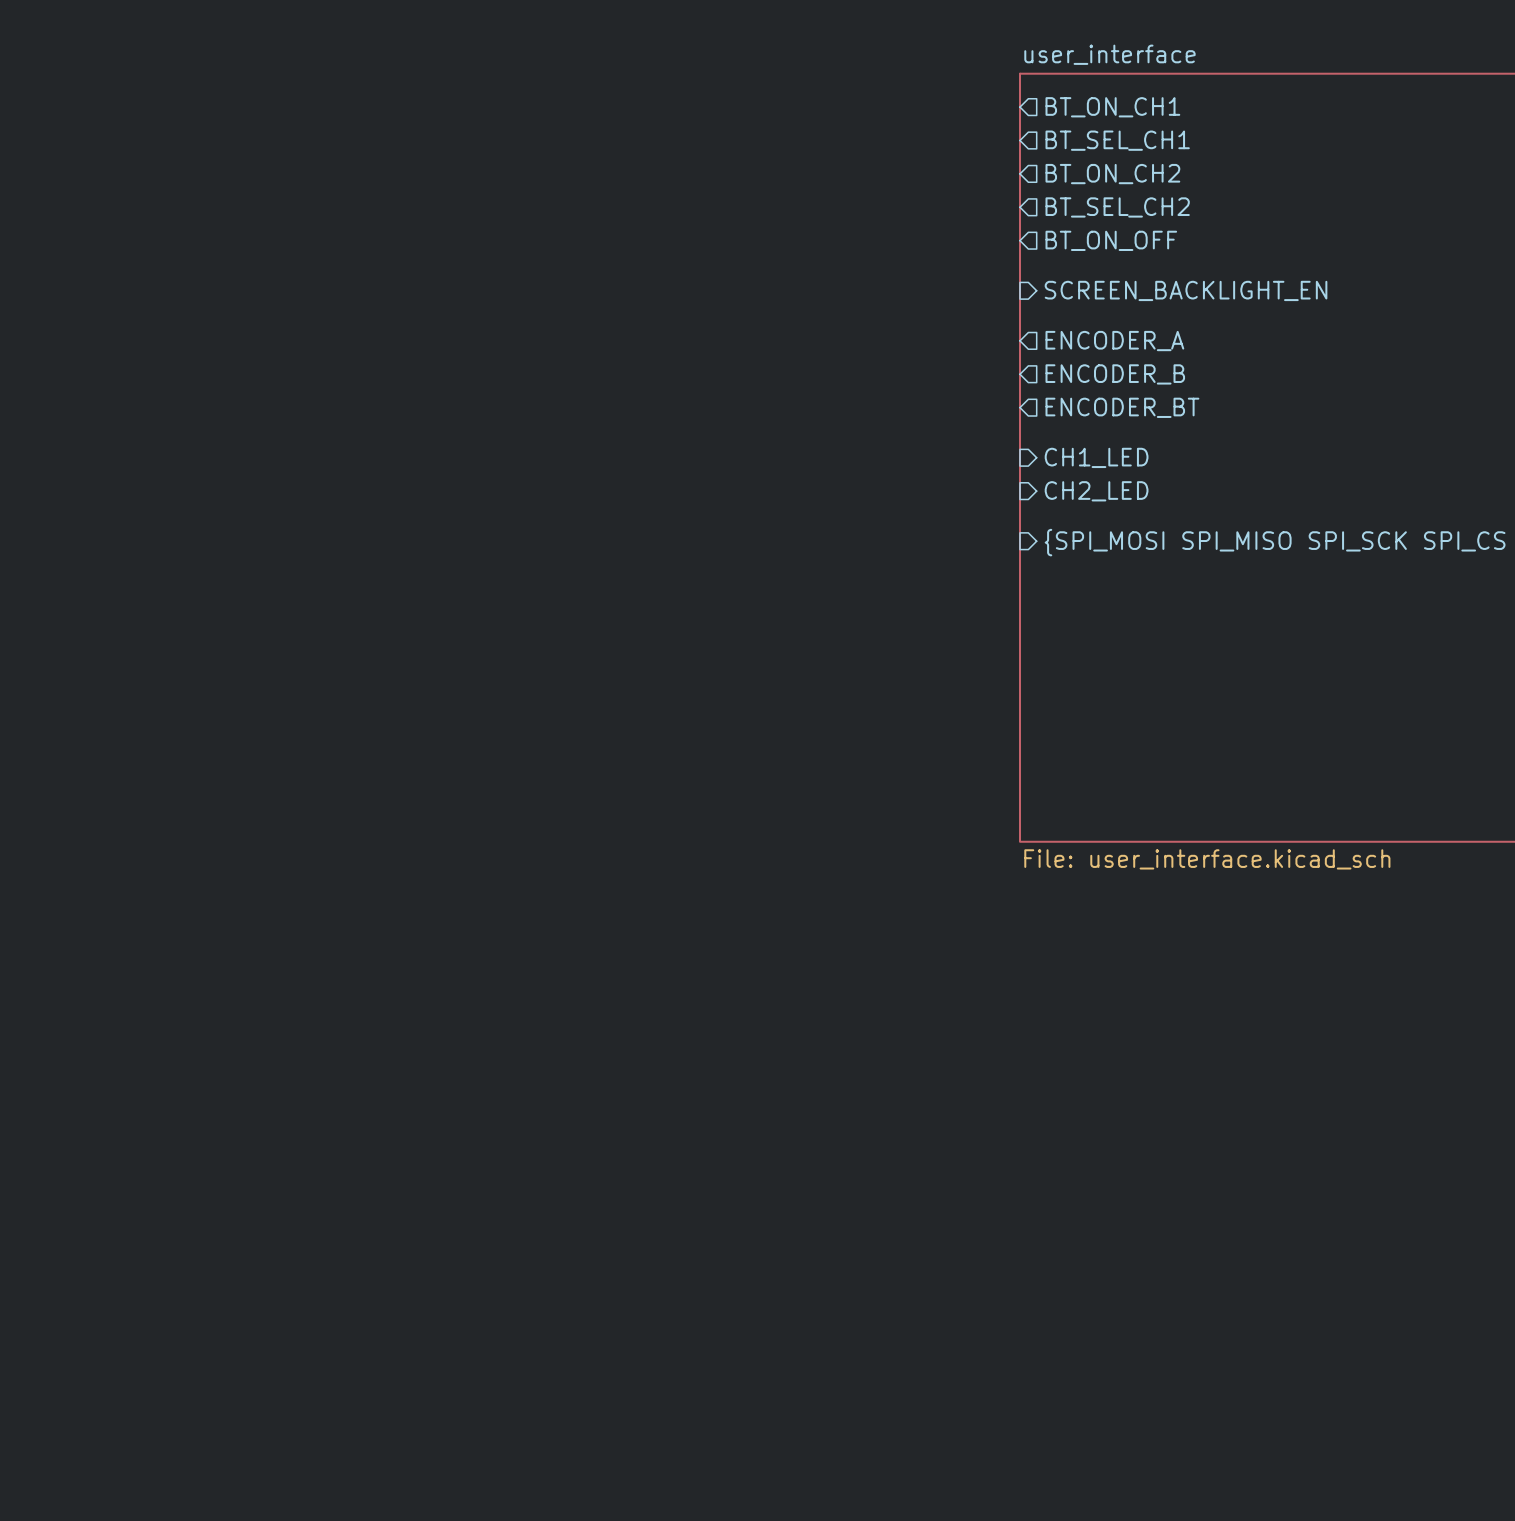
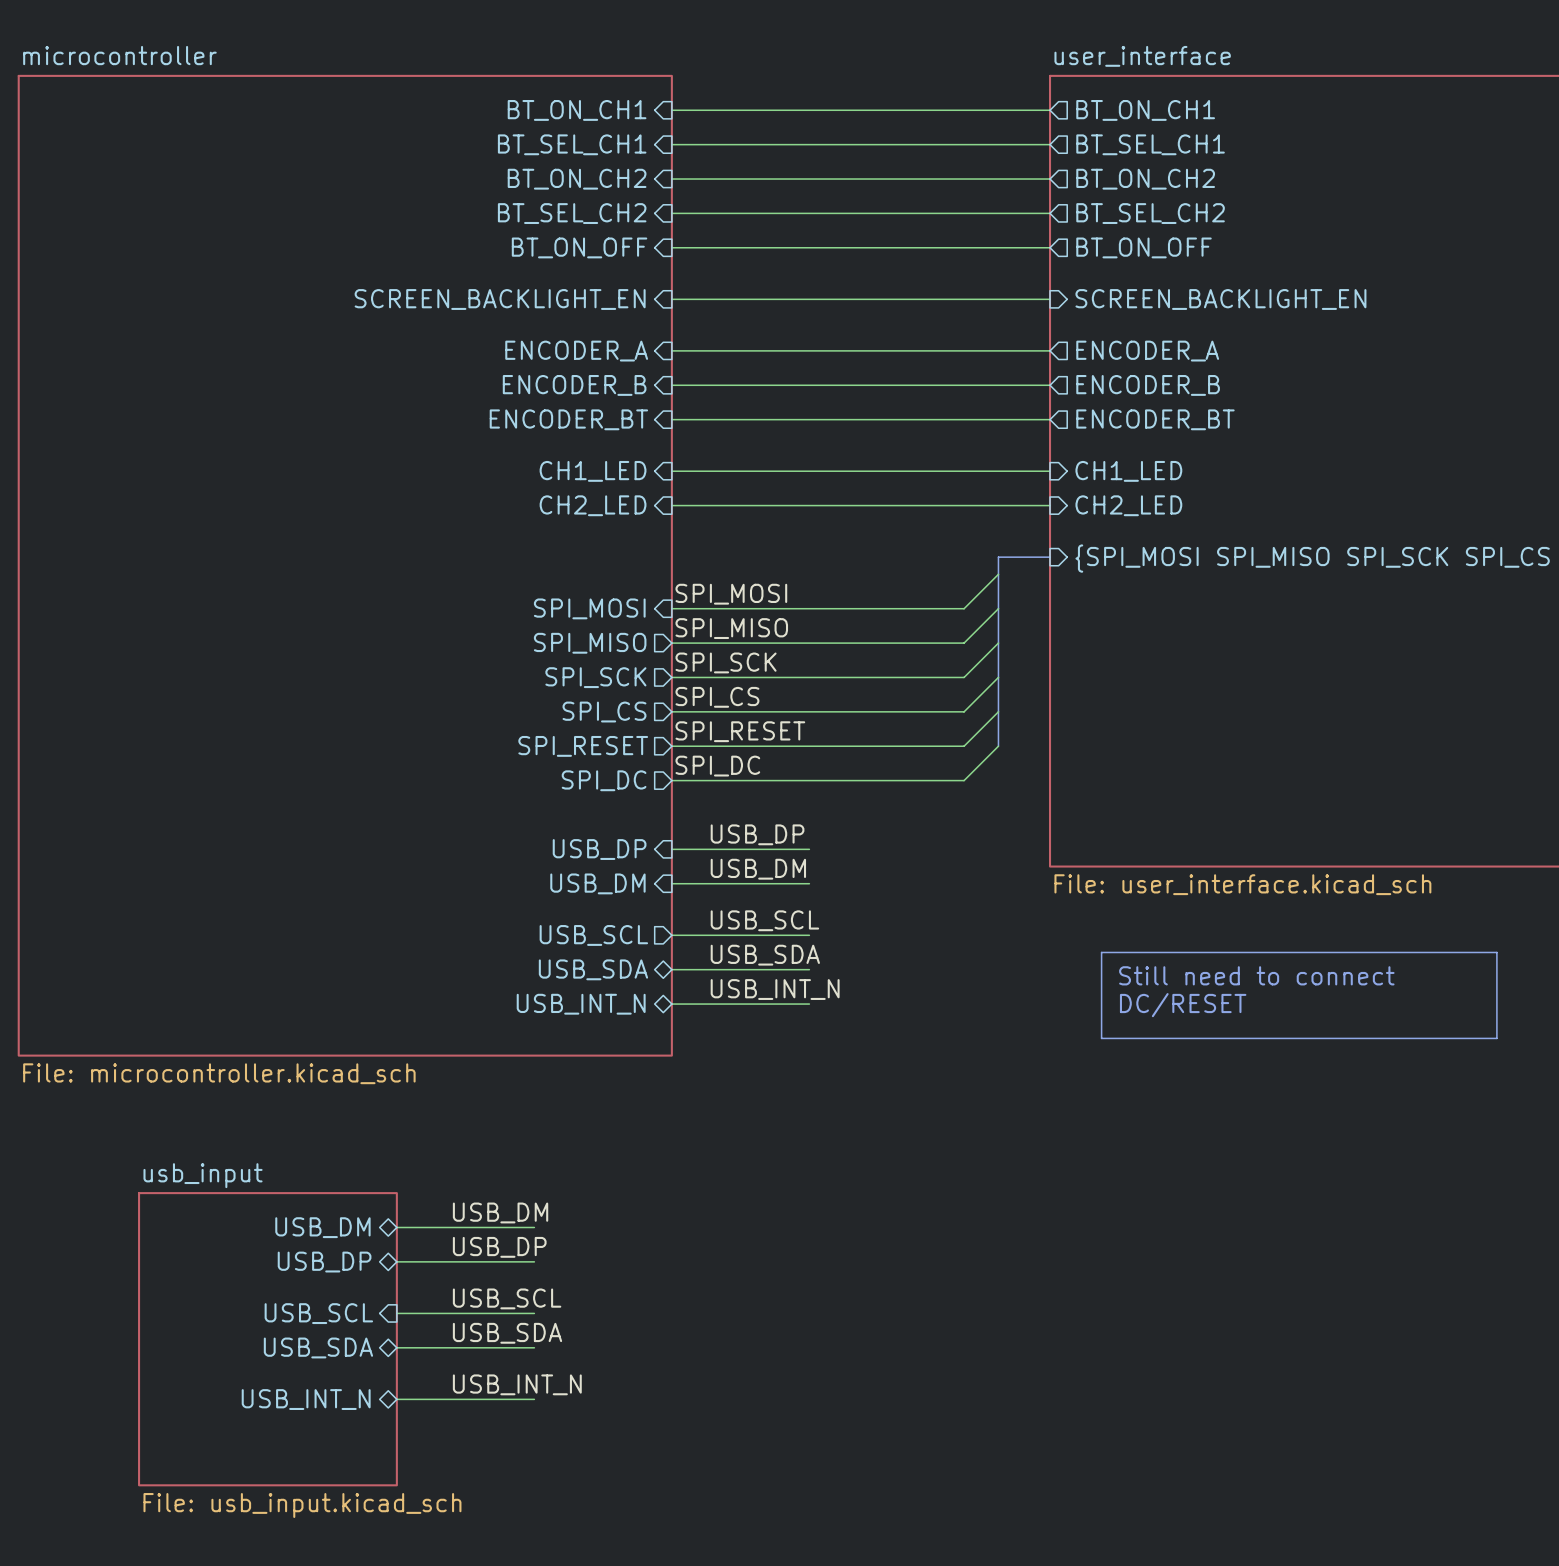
sheet pin: none -> BT_ON_CH1 (577, 110)
wire: none -> (671, 110) (1050, 110)
sheet pin: none -> BT_SEL_CH1 (572, 144)
wire: none -> (671, 144) (1050, 144)
wire: none -> (671, 179) (1050, 179)
sheet pin: none -> BT_ON_CH2 (577, 179)
sheet pin: none -> BT_SEL_CH2 (572, 213)
wire: none -> (671, 213) (1050, 213)
sheet pin: none -> BT_ON_OFF (579, 247)
wire: none -> (671, 247) (1050, 247)
sheet pin: none -> SCREEN_BACKLIGHT_EN (500, 299)
wire: none -> (671, 299) (1050, 299)
wire: none -> (671, 350) (1050, 350)
sheet pin: none -> ENCODER_A (576, 351)
sheet pin: none -> ENCODER_B (574, 385)
wire: none -> (671, 385) (1050, 385)
sheet pin: none -> ENCODER_BT (568, 419)
wire: none -> (671, 419) (1050, 419)
sheet pin: none -> CH1_LED (593, 471)
wire: none -> (671, 471) (1050, 471)
sheet pin: none -> CH2_LED (593, 505)
wire: none -> (671, 505) (1050, 505)
bus: none -> (1050, 557) (998, 557) (998, 746)
sheet microcontroller: none -> File: microcontroller.kicad_sch (345, 565)
wire: none -> (998, 574) (964, 608) (671, 608)
label: none -> SPI_MOSI (731, 594)
sheet pin: none -> SPI_MOSI (589, 608)
wire: none -> (998, 608) (964, 643) (671, 643)
label: none -> SPI_MISO (731, 628)
sheet pin: none -> SPI_MISO (590, 643)
wire: none -> (998, 643) (964, 677) (671, 677)
label: none -> SPI_SCK (726, 662)
sheet pin: none -> SPI_SCK (595, 677)
wire: none -> (998, 677) (964, 711) (671, 711)
label: none -> SPI_CS (717, 697)
sheet pin: none -> SPI_CS (604, 712)
wire: none -> (998, 711) (964, 746) (671, 746)
label: none -> SPI_RESET (740, 731)
wire: none -> (998, 746) (964, 780) (671, 780)
sheet pin: none -> SPI_RESET (583, 746)
label: none -> SPI_DC (717, 766)
sheet pin: none -> SPI_DC (604, 780)
label: none -> USB_DP (757, 834)
sheet pin: none -> USB_DP (599, 849)
wire: none -> (671, 849) (809, 849)
label: none -> USB_DM (758, 869)
sheet pin: none -> USB_DM (597, 883)
wire: none -> (671, 883) (809, 883)
label: none -> USB_SCL (764, 920)
sheet pin: none -> USB_SCL (593, 935)
wire: none -> (671, 935) (809, 935)
line: none -> (1101, 952) (1496, 952) (1496, 1038) (1101, 1038) (1101, 952)
label: none -> USB_SDA (765, 955)
wire: none -> (671, 969) (809, 969)
sheet pin: none -> USB_SDA (593, 969)
text: none -> Still need to connect (1256, 975)
label: none -> USB_INT_N (775, 989)
sheet pin: none -> USB_INT_N (581, 1004)
wire: none -> (671, 1004) (809, 1004)
text: none -> DC/RESET (1183, 1005)
label: none -> USB_DM (500, 1212)
sheet pin: none -> USB_DM (322, 1227)
wire: none -> (396, 1227) (534, 1227)
label: none -> USB_DP (499, 1247)
sheet pin: none -> USB_DP (324, 1262)
wire: none -> (396, 1261) (534, 1261)
label: none -> USB_SCL (507, 1298)
wire: none -> (396, 1313) (534, 1313)
sheet pin: none -> USB_SCL (318, 1313)
label: none -> USB_SDA (507, 1333)
sheet usb_input: none -> File: usb_input.kicad_sch (267, 1339)
sheet pin: none -> USB_SDA (318, 1347)
wire: none -> (396, 1347) (534, 1347)
label: none -> USB_INT_N (517, 1384)
sheet pin: none -> USB_INT_N (306, 1399)
wire: none -> (396, 1399) (534, 1399)

